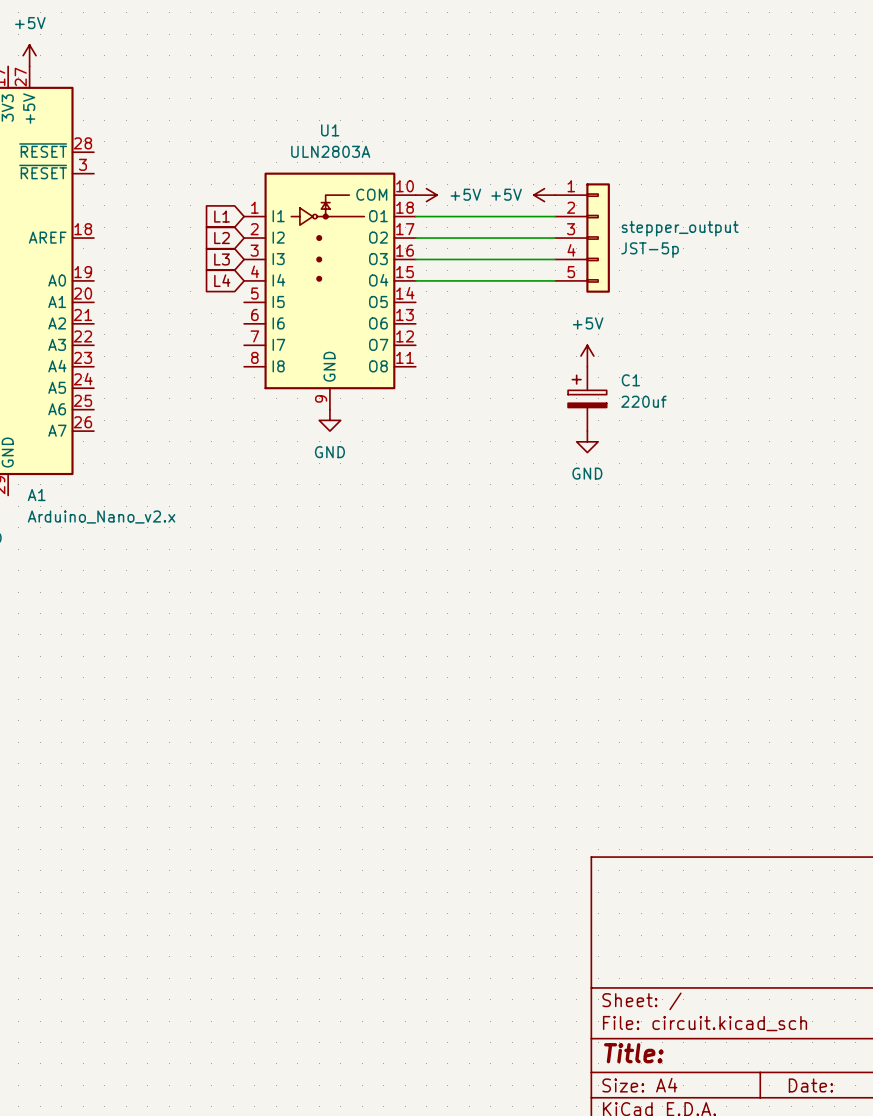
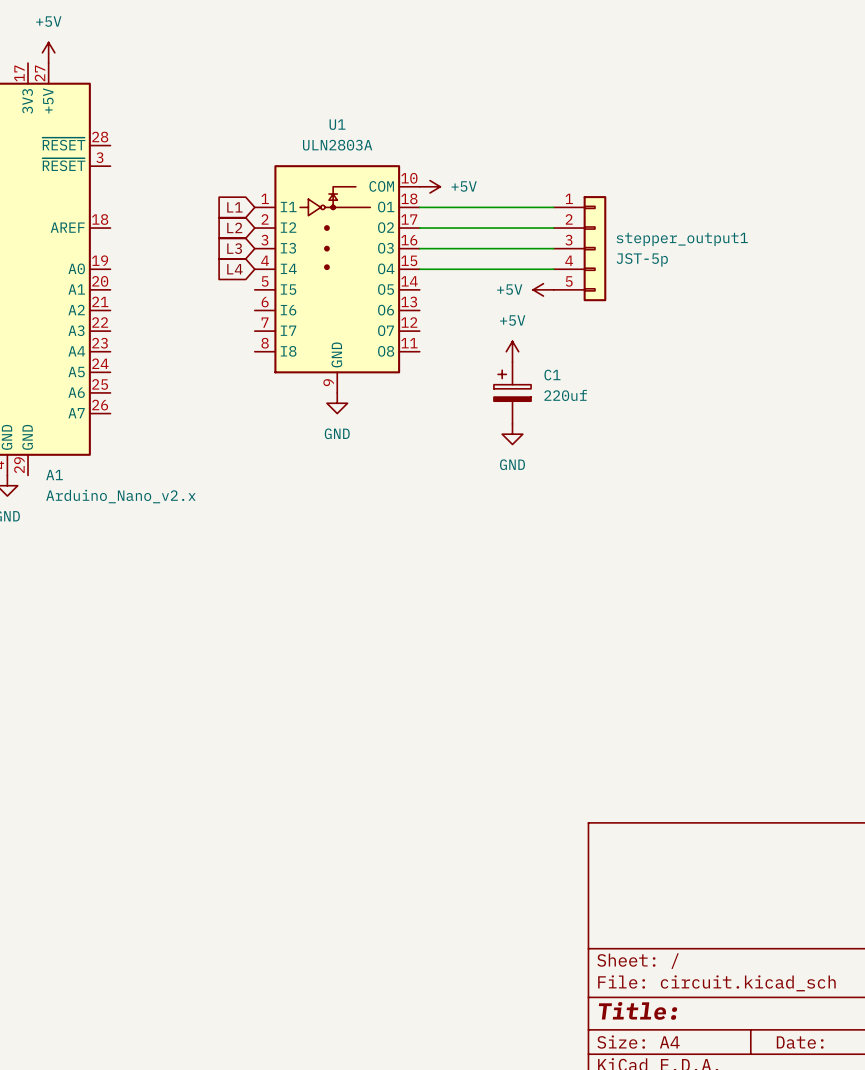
power symbol: +5V (544, 195) -> none
stepper_output: JST-5p (582, 238) -> none
stepper_output1: none -> JST-5p (580, 248)
power symbol: none -> +5V (543, 289)
power symbol: +5V (587, 356) -> none
power symbol: none -> +5V (512, 351)
C1 position: (587, 398) -> (512, 392)
power symbol position: GND (587, 441) -> GND (512, 434)

